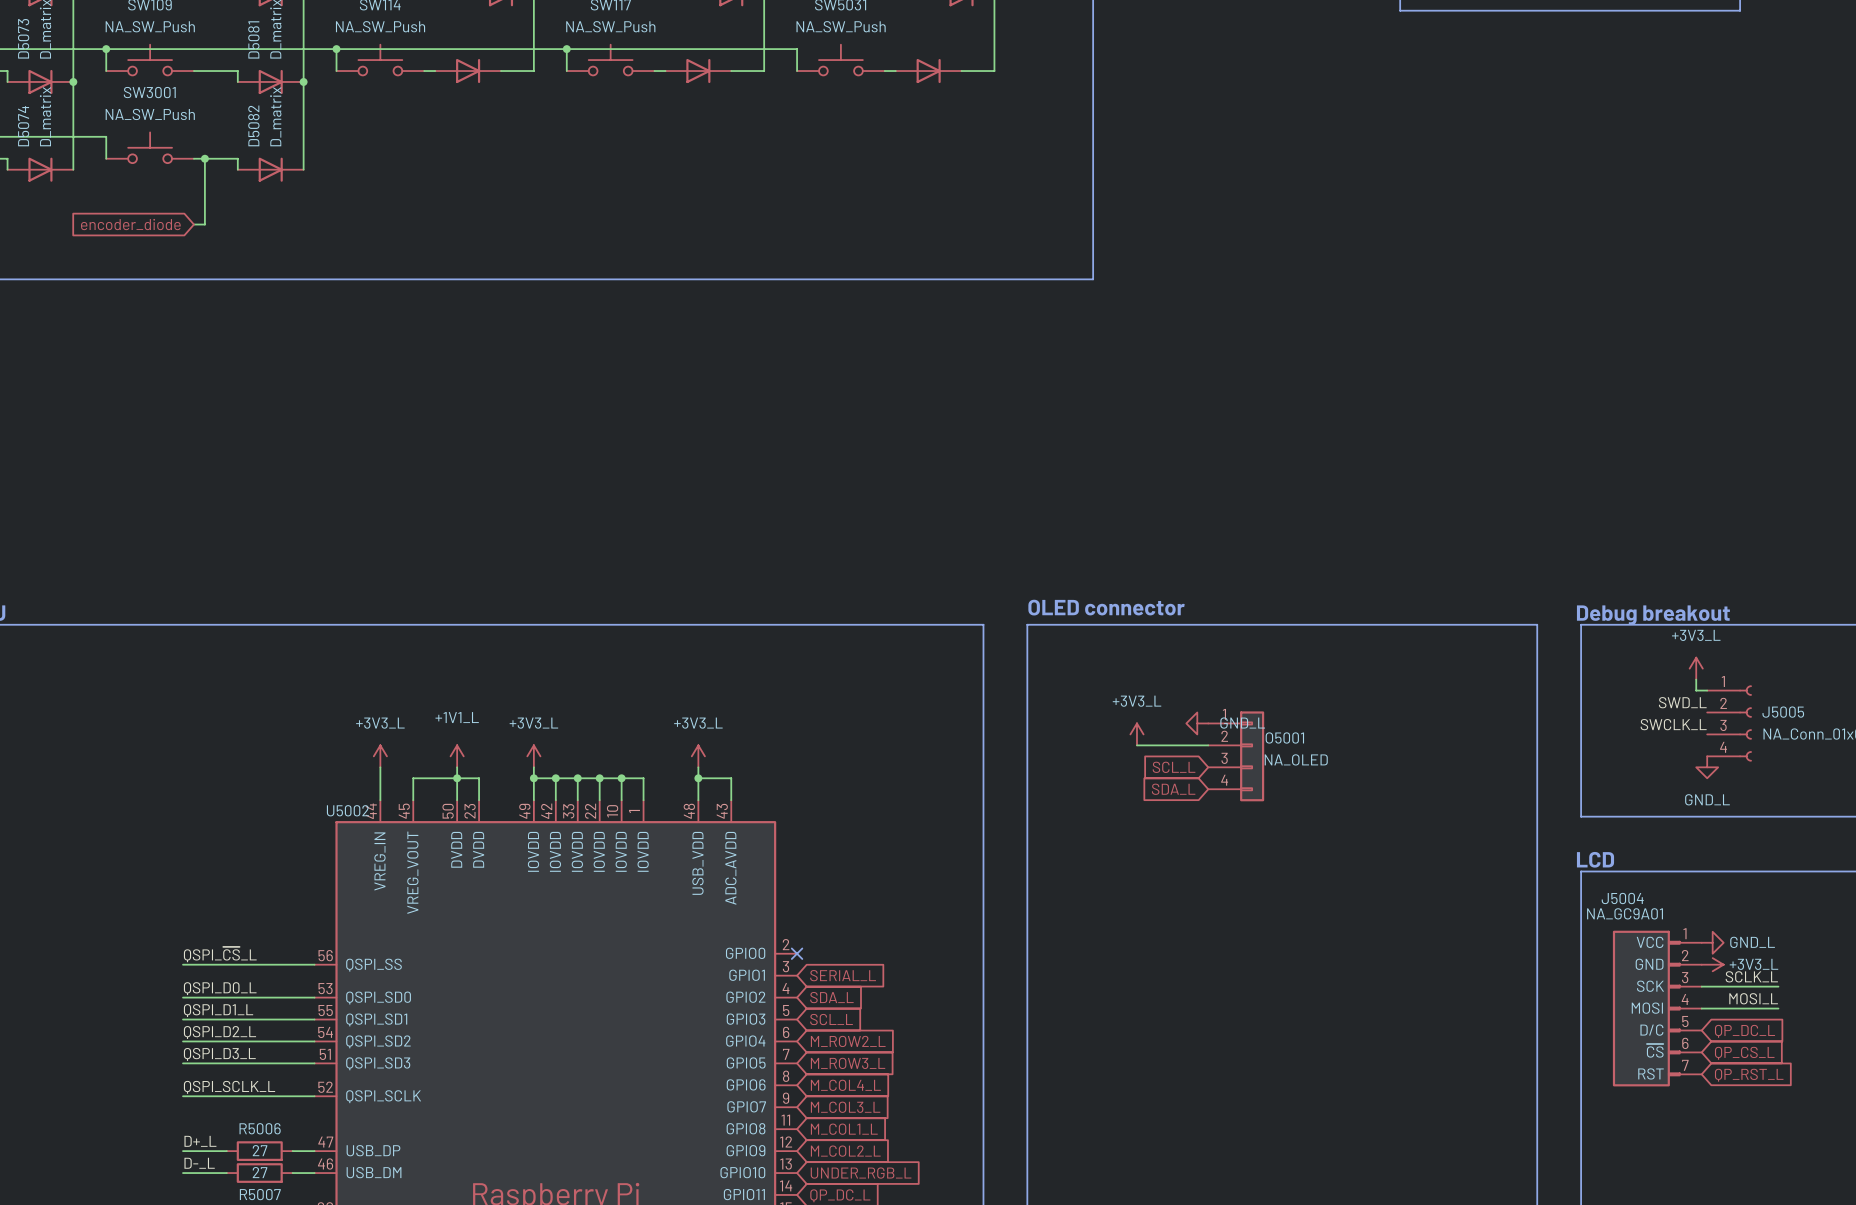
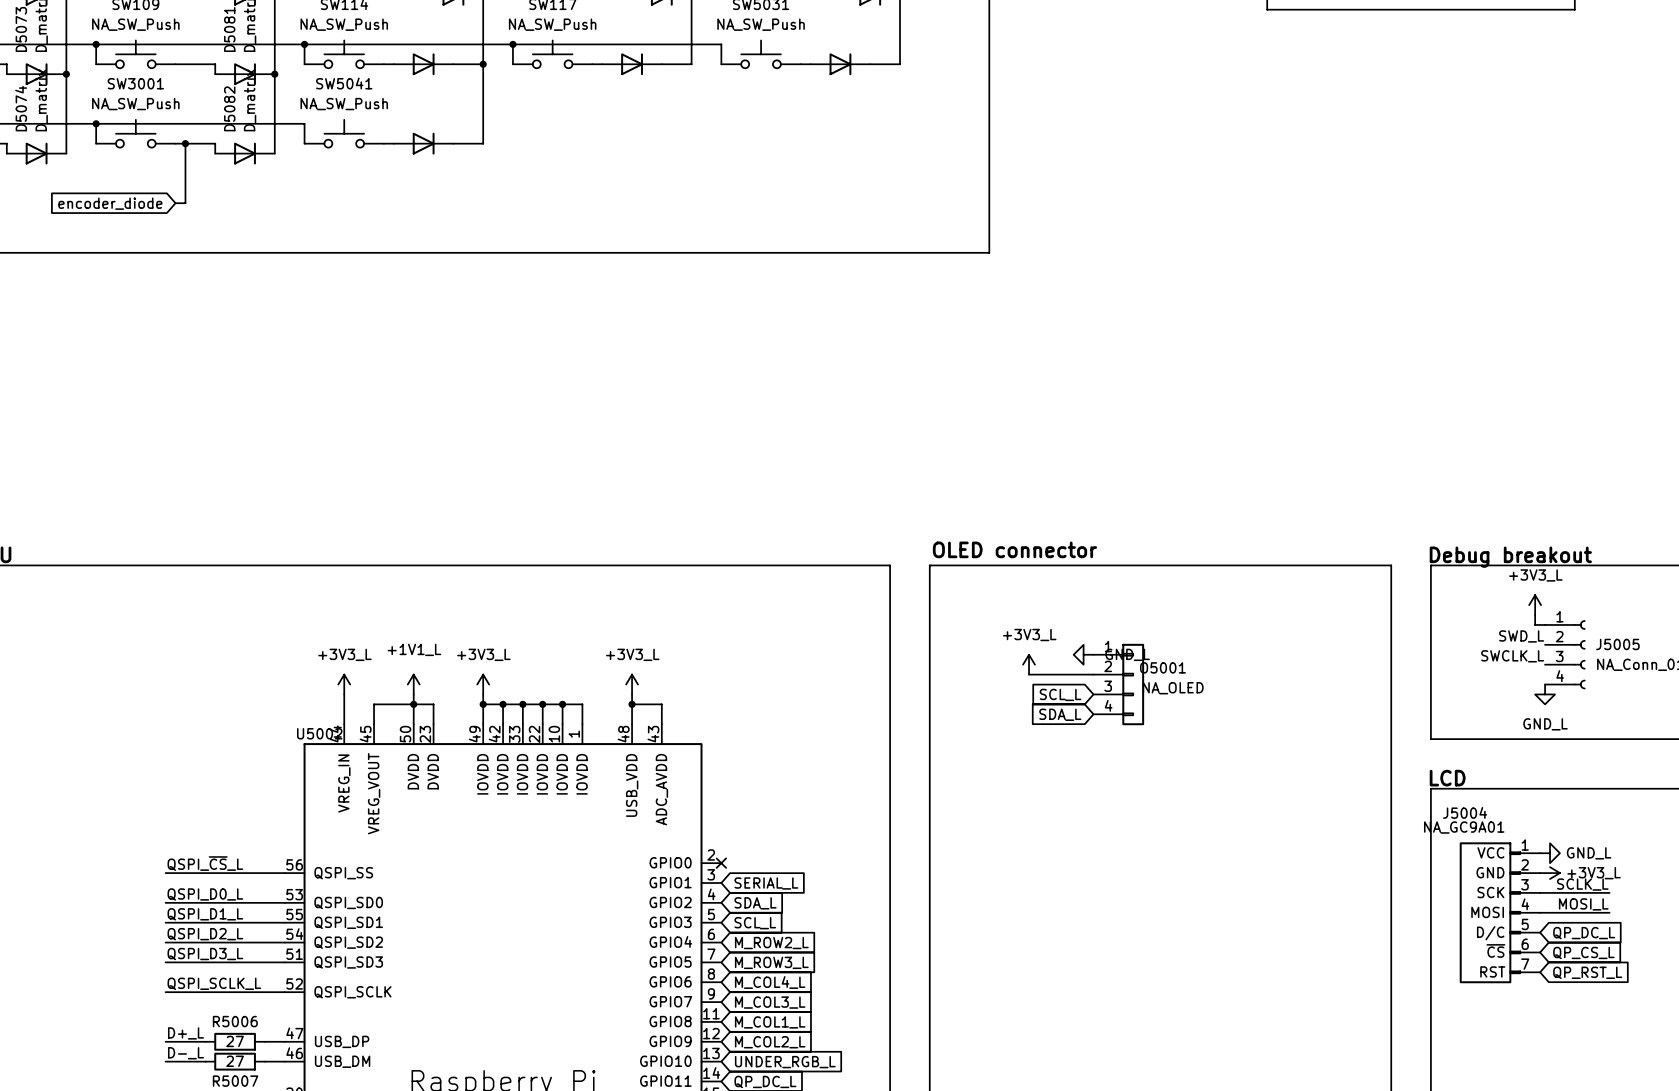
wire: none -> (483, 64) (483, 143) (453, 143)
junction: none -> (483, 64)
wire: none -> (96, 123) (304, 123) (304, 143)
junction: none -> (96, 123)
SW5041: none -> NA_SW_Push (344, 133)
wire: none -> (383, 143) (393, 143)
part: none -> (423, 143)

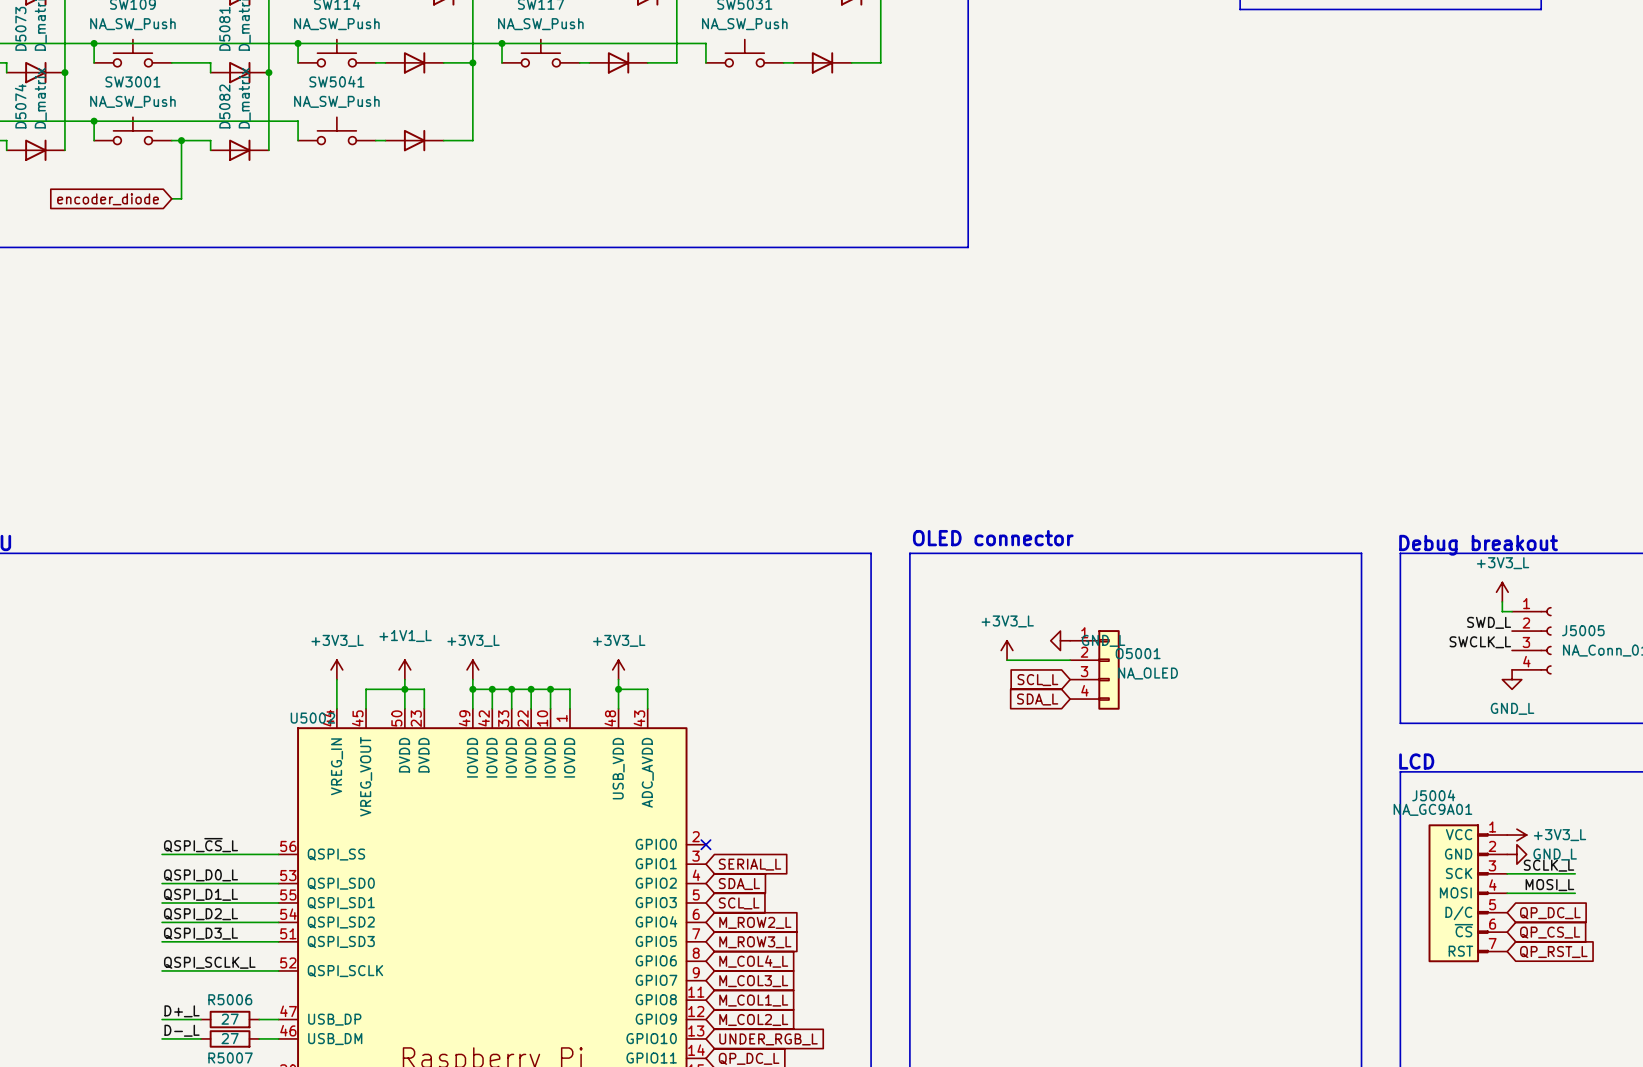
power symbol: GND_L (1550, 853) -> +3V3_L (1516, 835)
power symbol: +3V3_L (1550, 873) -> GND_L (1516, 854)

